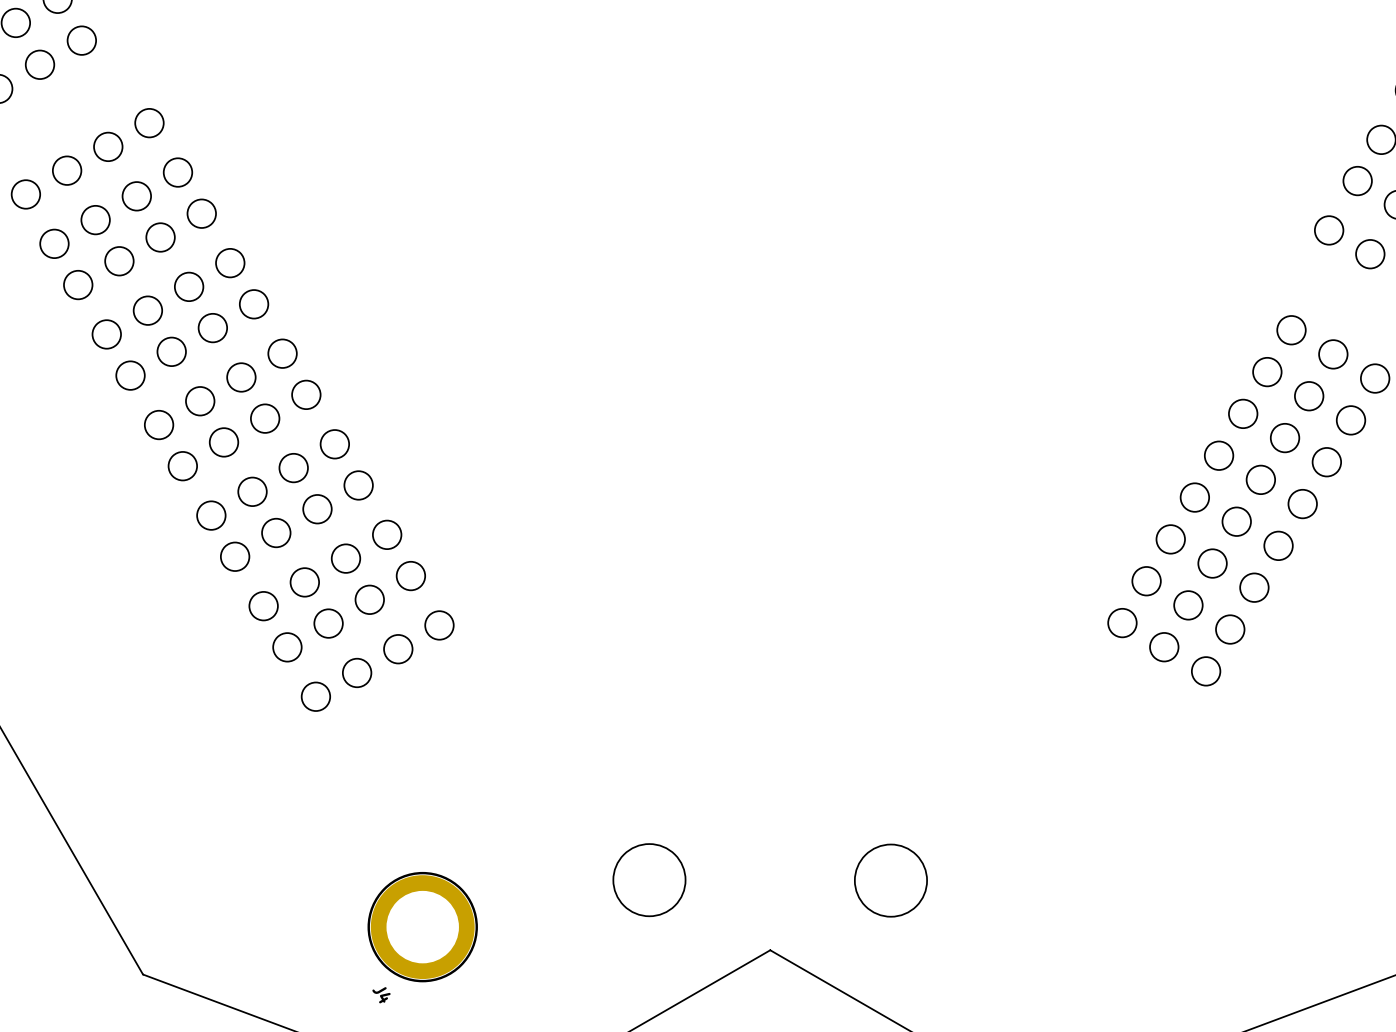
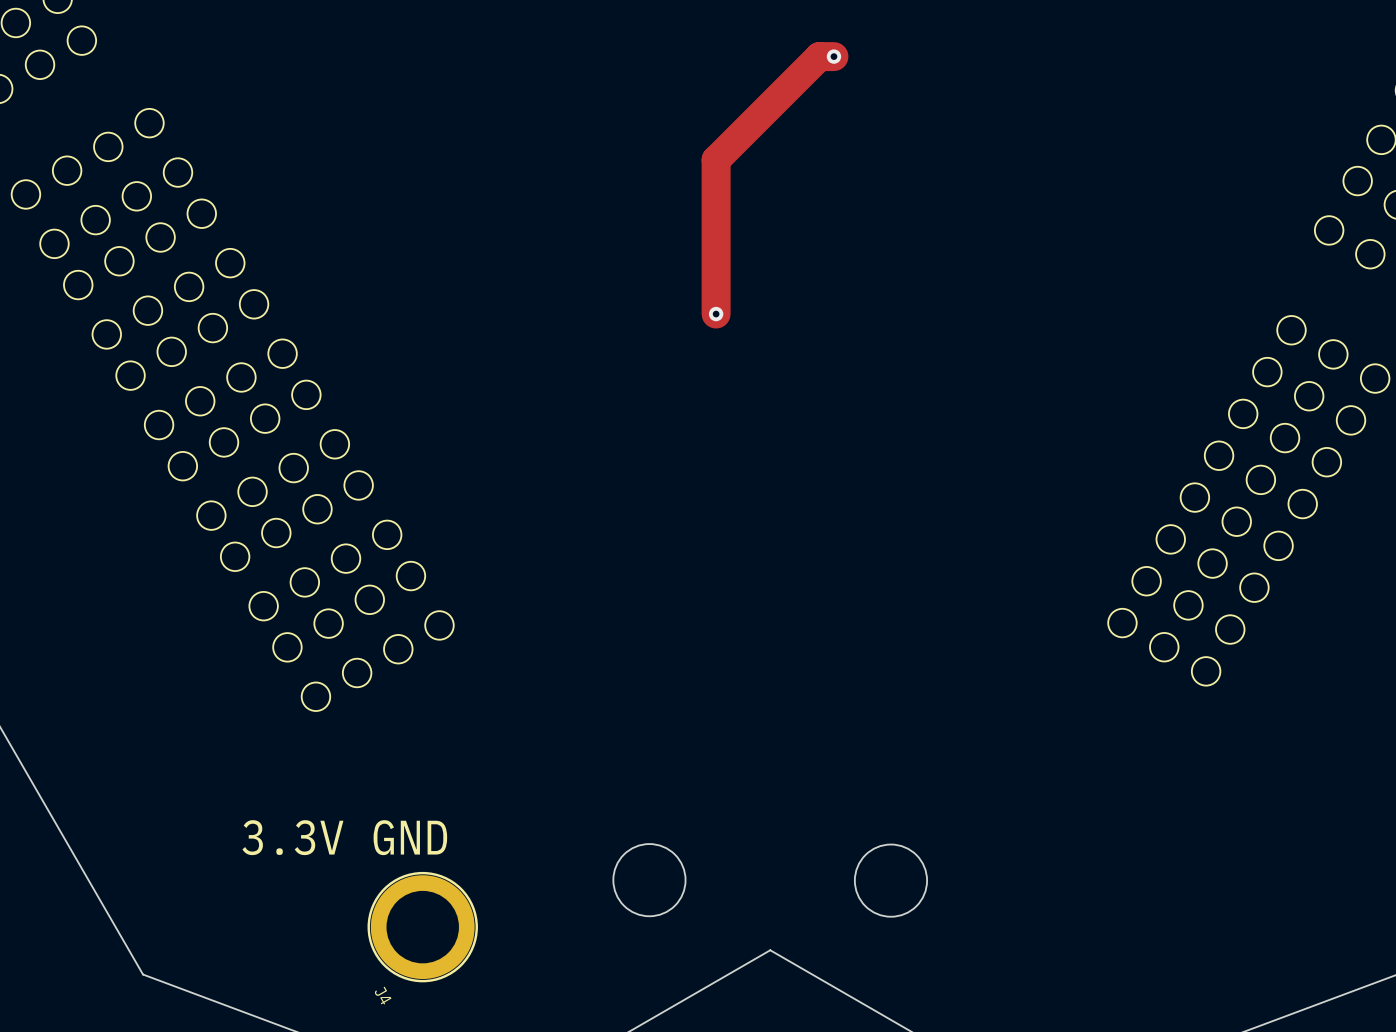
track: none -> (833, 56) (819, 56) (716, 159) (716, 314)
via: none -> (833, 56)
via: none -> (716, 314)
text: none -> 3.3V GND (344, 837)

